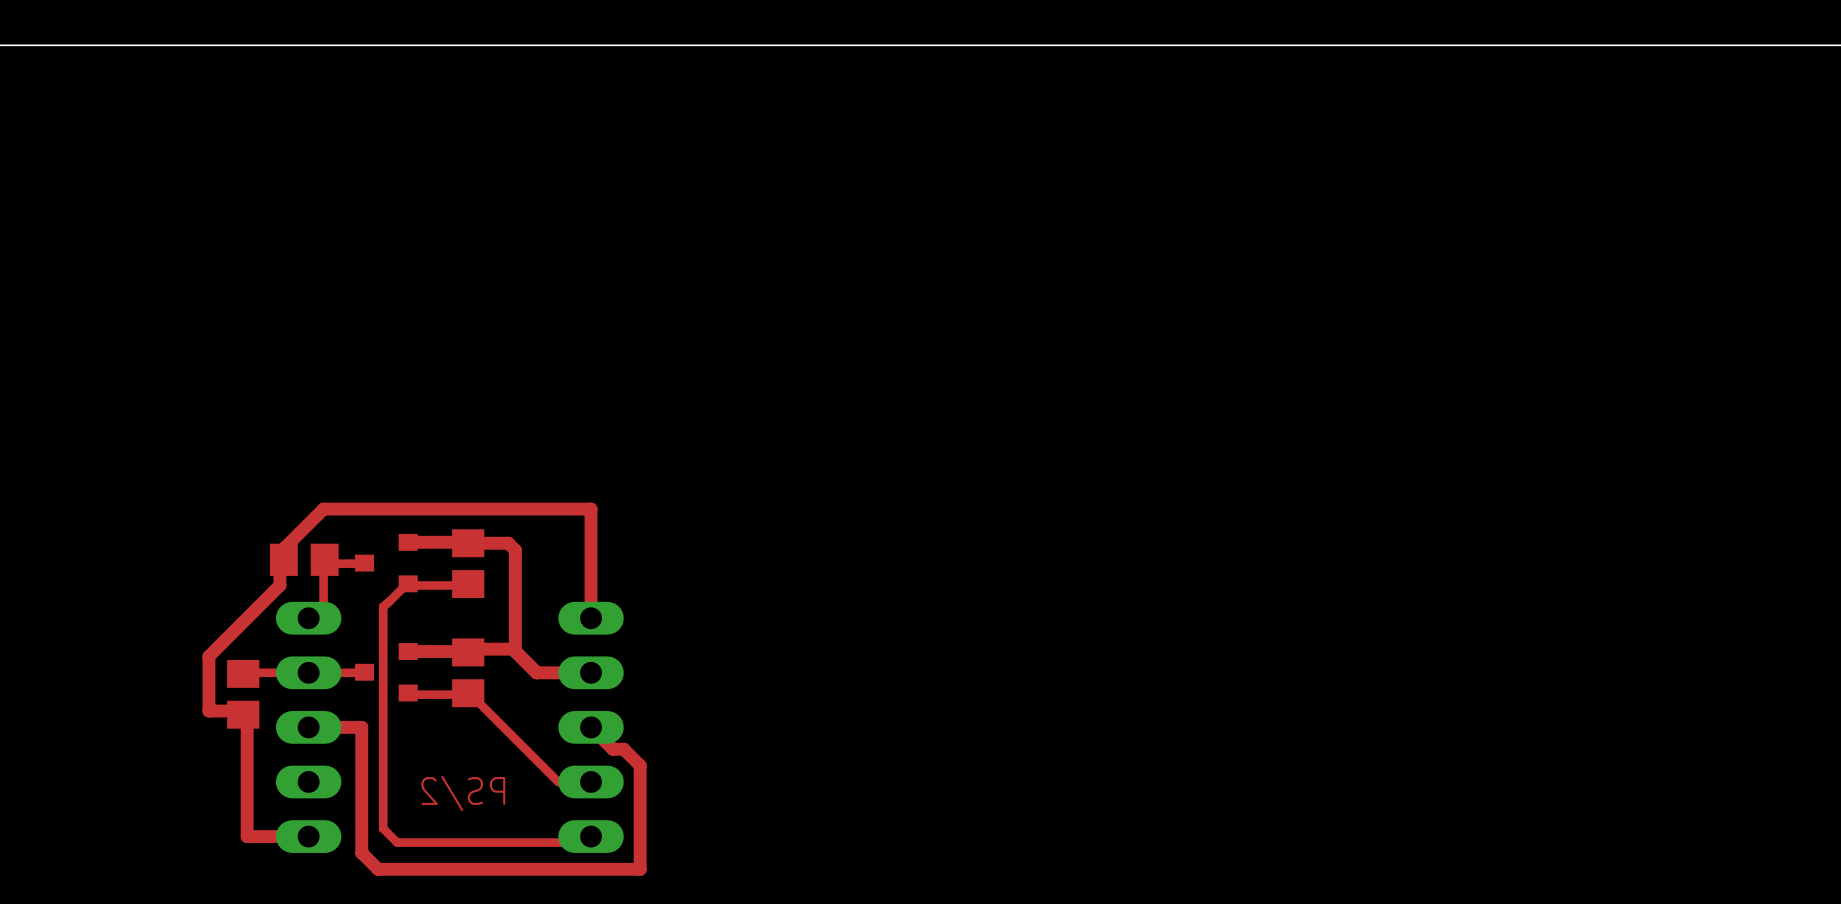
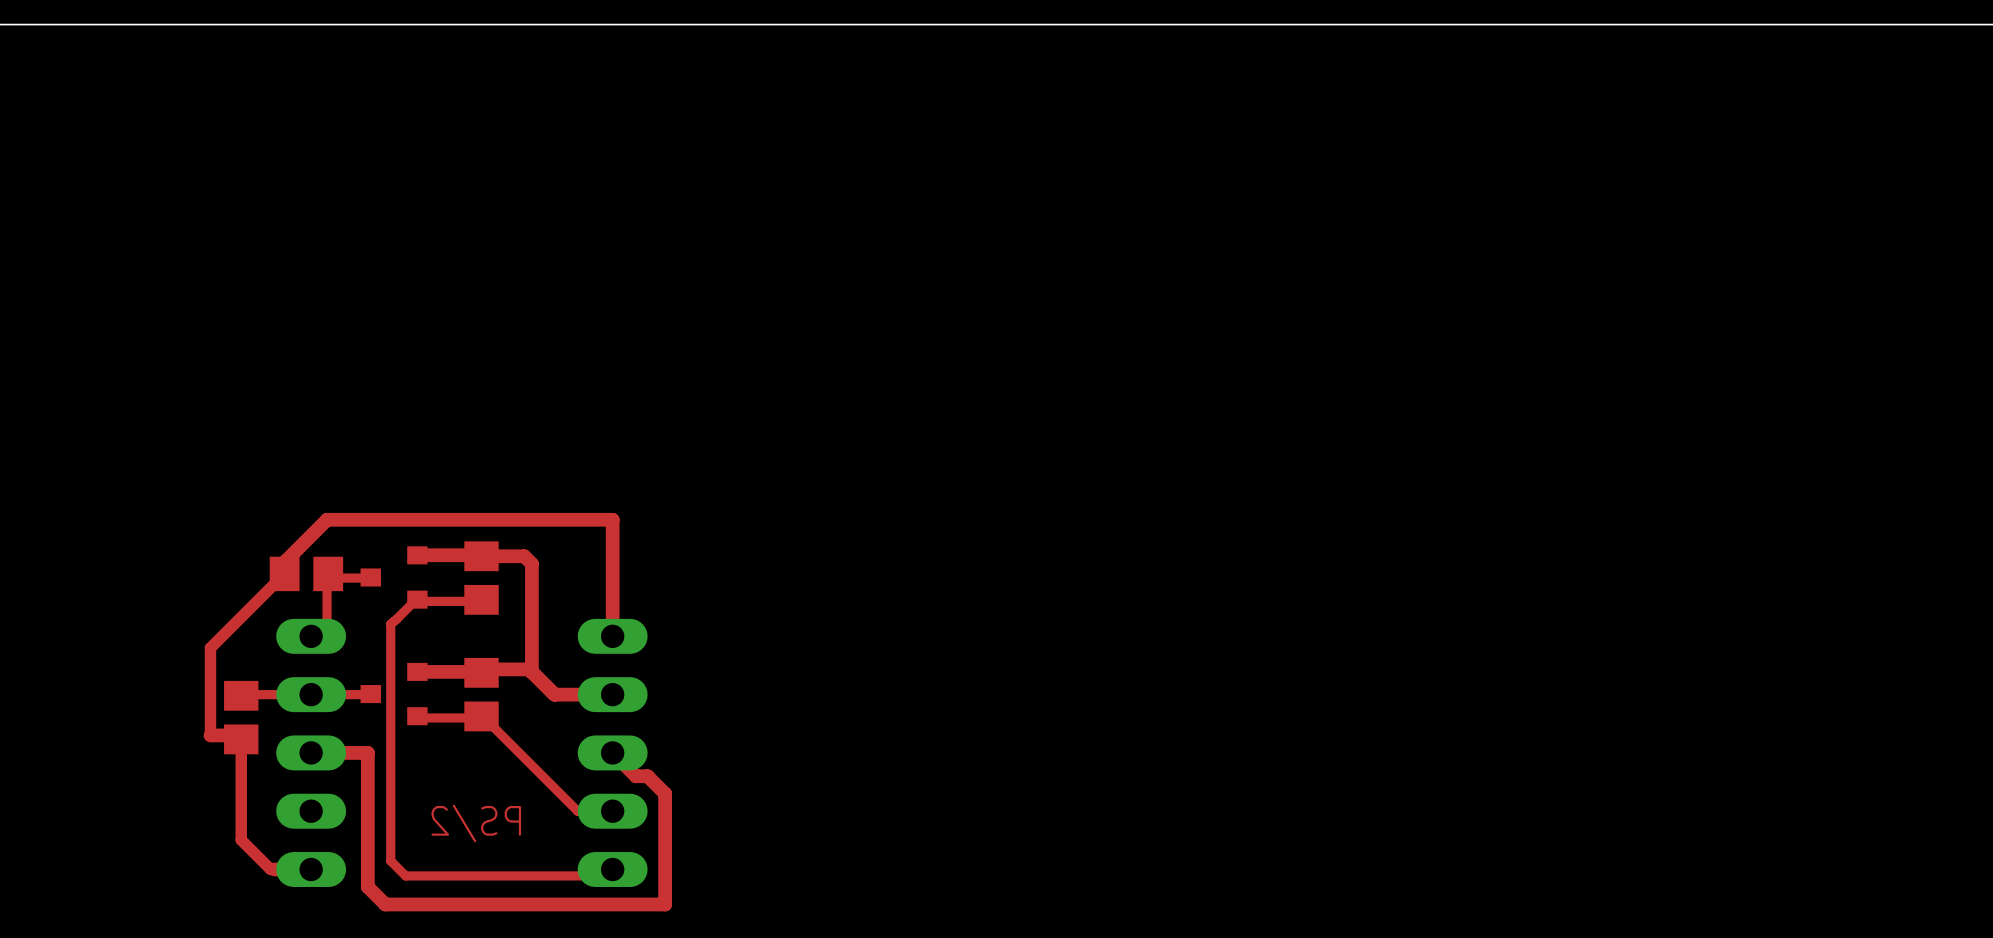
top track: (279, 563) (279, 585) (208, 656) (208, 711) (214, 711) -> (280, 578) (210, 648) (210, 735)
top track: (243, 714) (247, 716) (247, 836) (274, 836) -> (241, 739) (241, 840) (270, 869) (274, 869)

